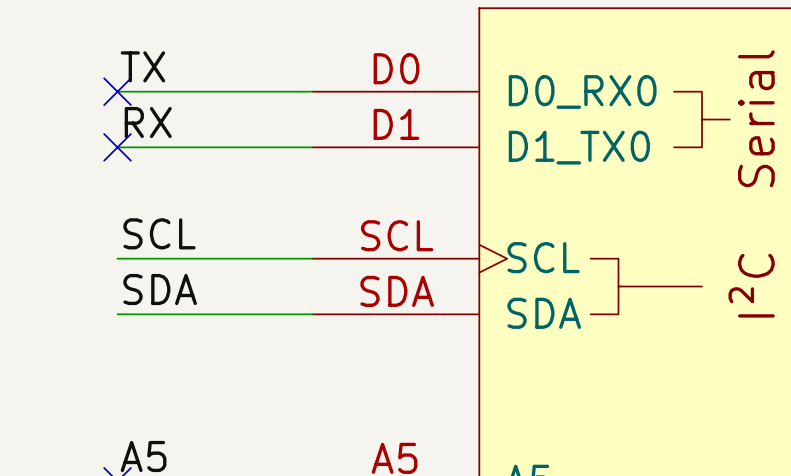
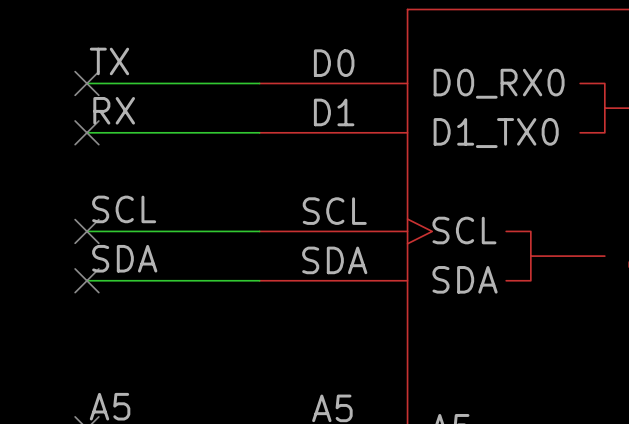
no-connect mark: none -> (86, 231)
no-connect mark: none -> (86, 280)

